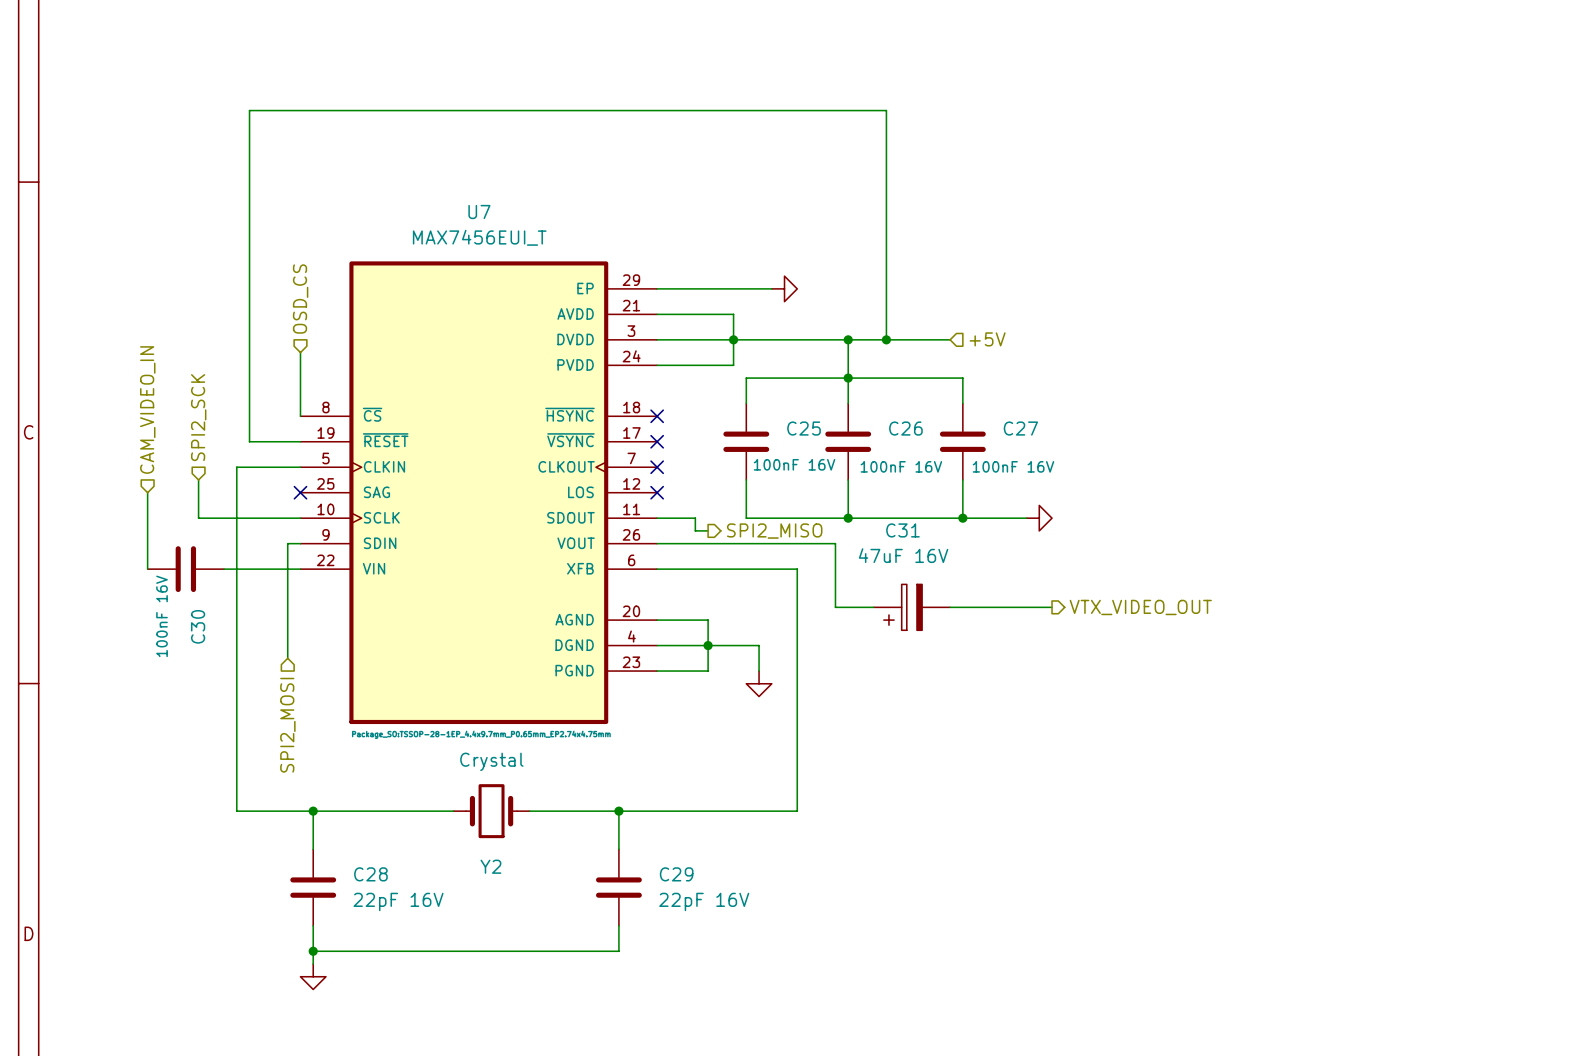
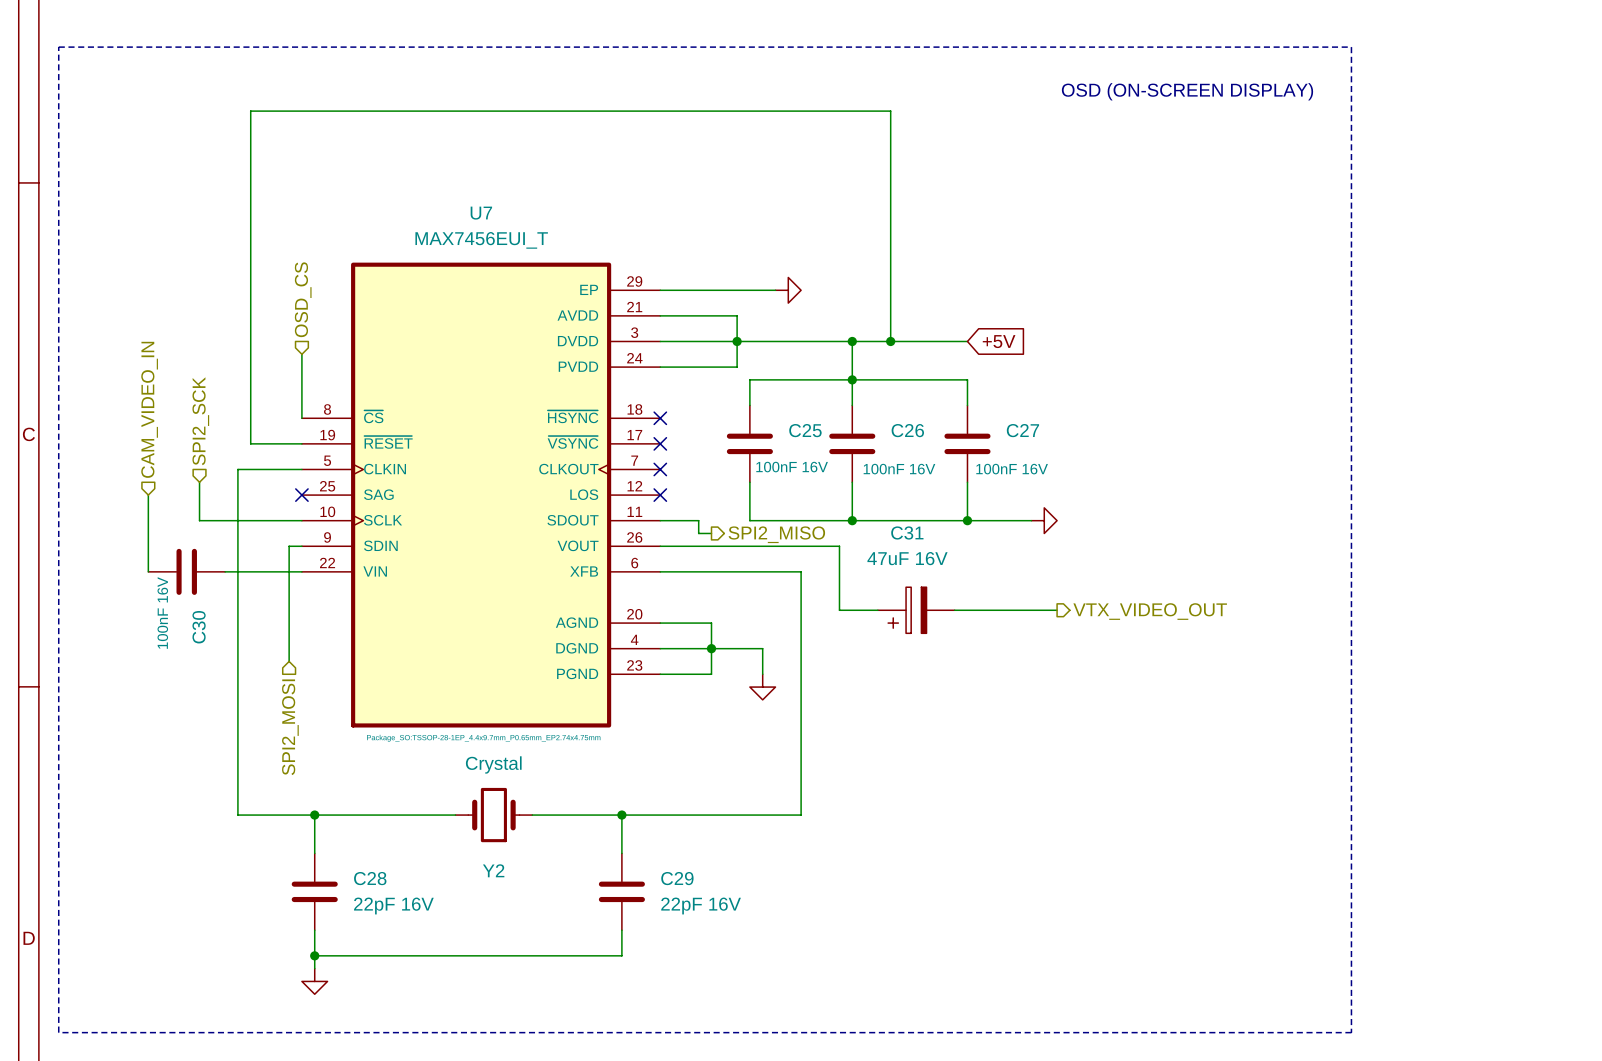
line: none -> (58, 47) (1351, 47) (1351, 1032) (58, 1032) (58, 47)
text: none -> OSD (ON-SCREEN DISPLAY) (1187, 91)
wire: none -> (954, 341) (967, 341)
hierarchical label: +5V (987, 339) -> none
global label: none -> +5V (999, 341)

